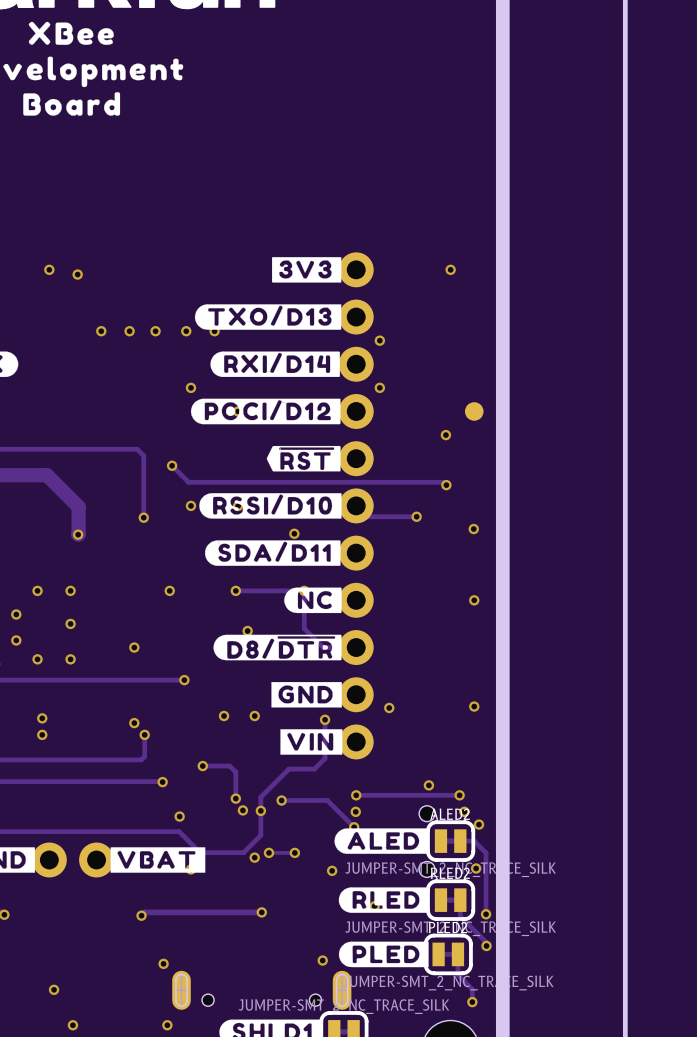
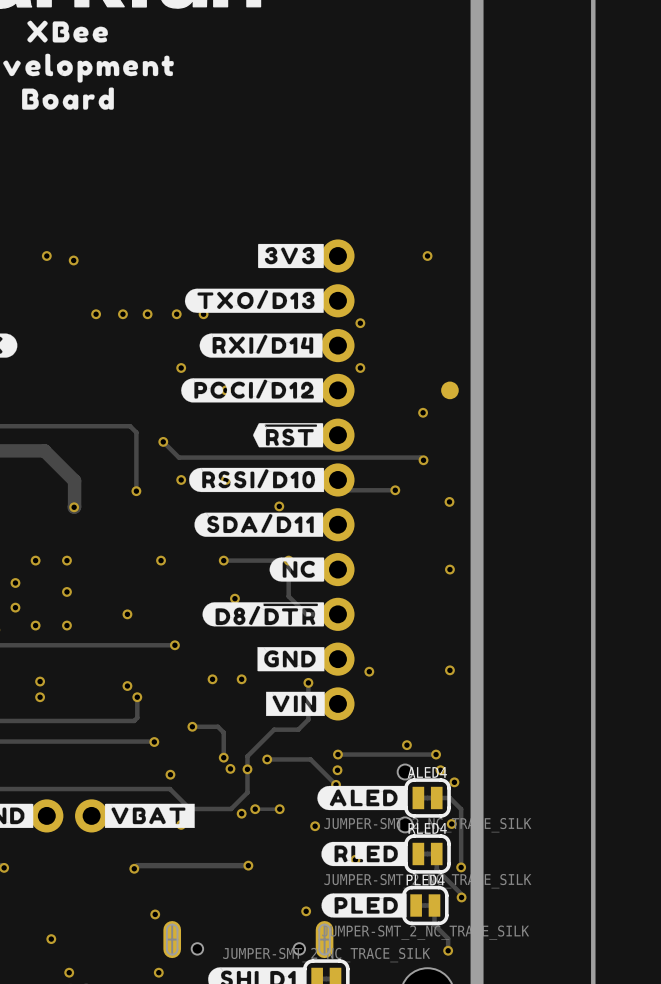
ALED2 name: ALED2 (450, 814) -> ALED4 (427, 772)
RLED2 name: RLED2 (450, 873) -> RLED4 (427, 828)
PLED2 name: PLED2 (447, 927) -> PLED4 (425, 879)

